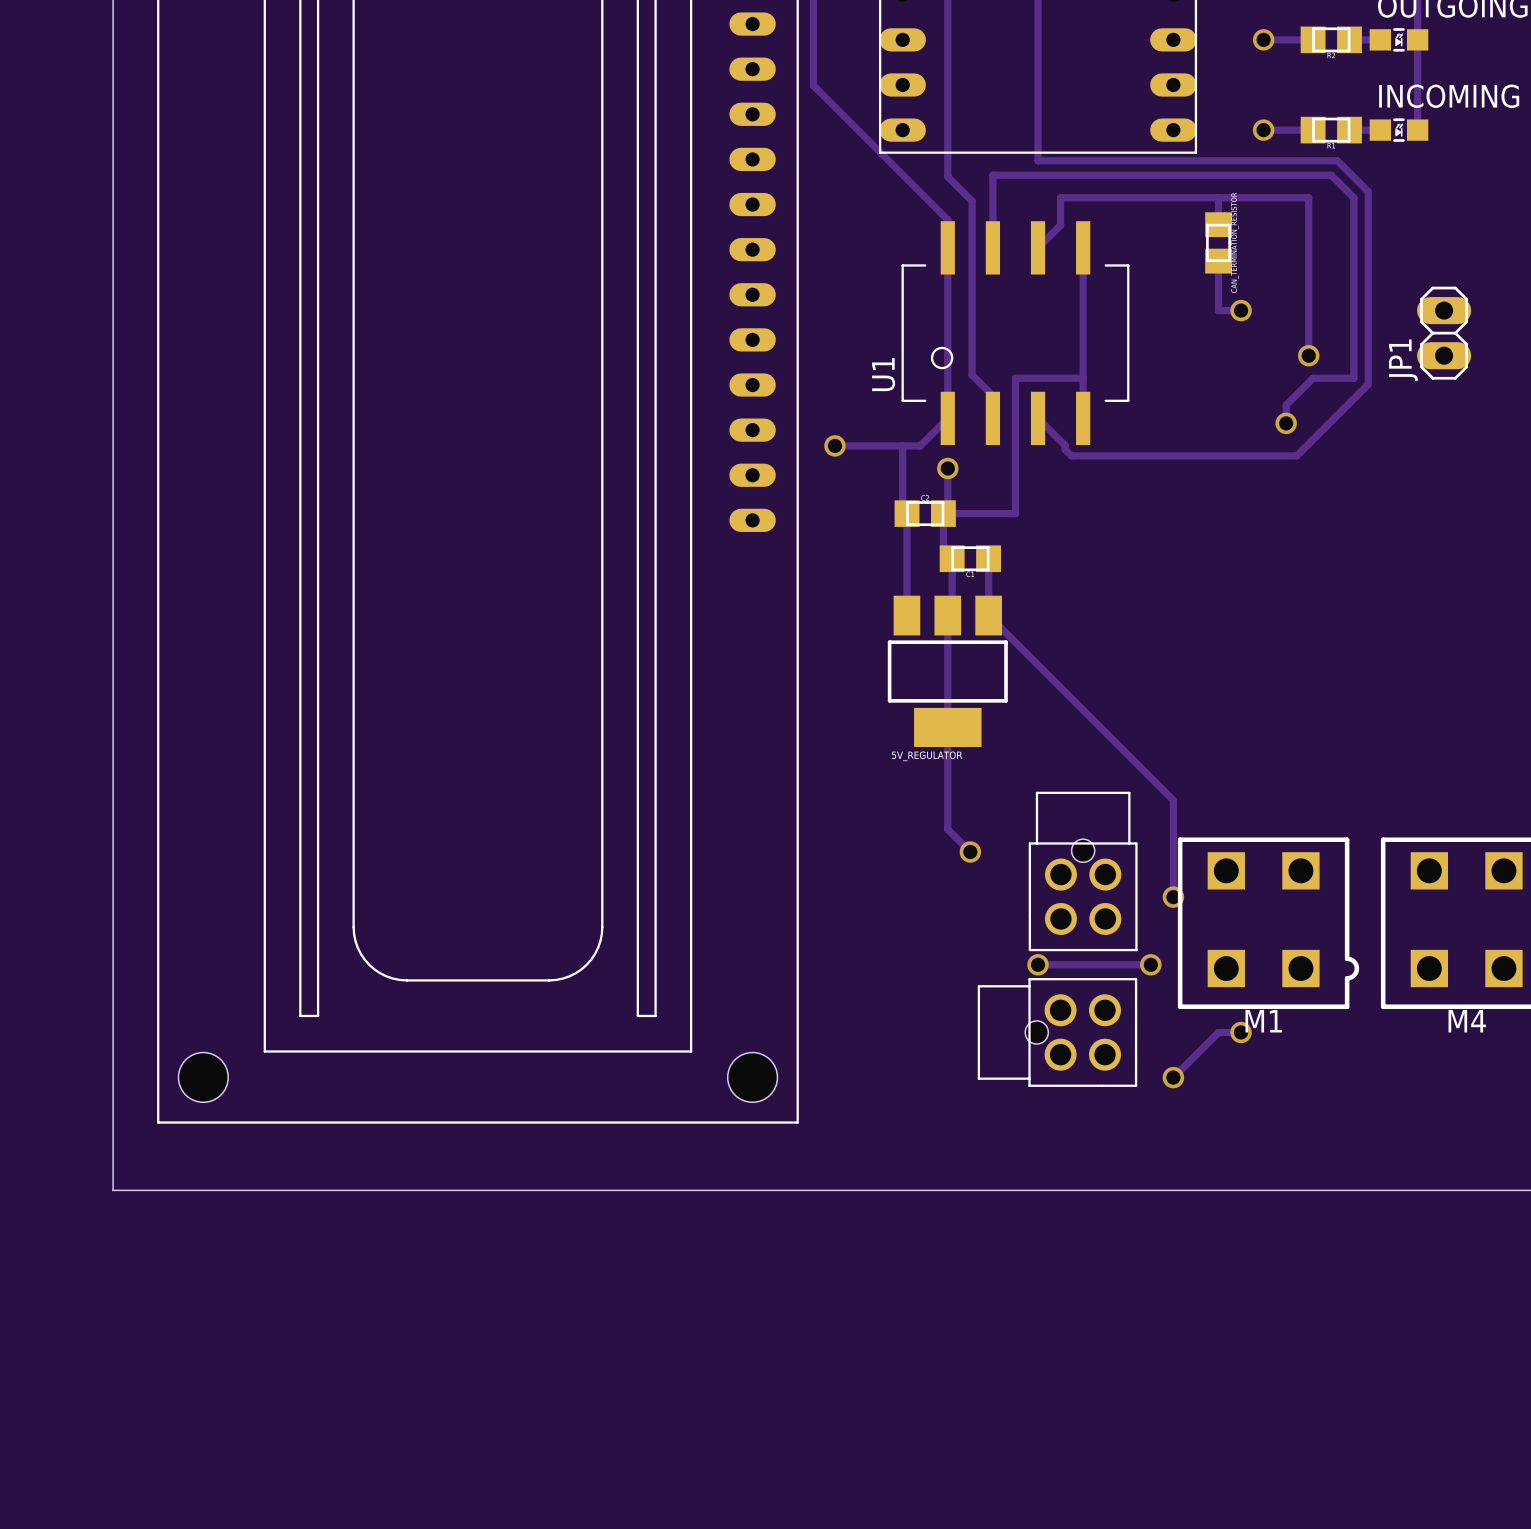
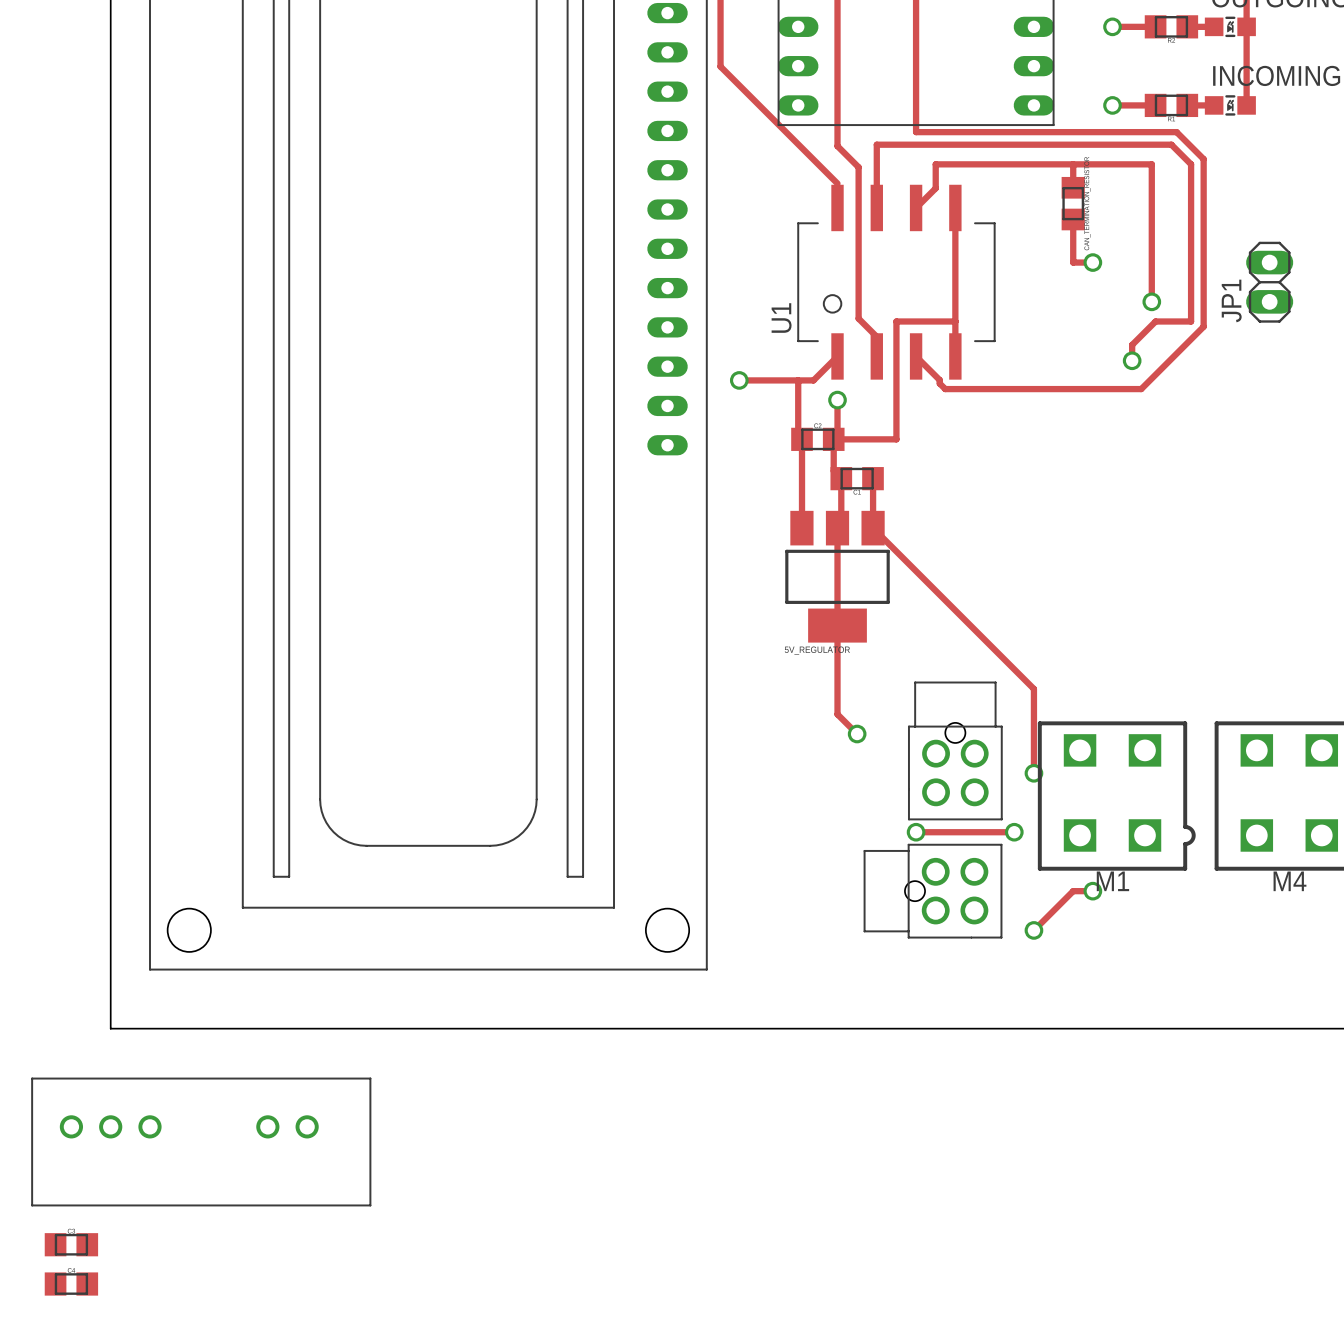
track: (947, 219) (947, 418) -> none
part: none -> (201, 1141)
part: none -> (71, 1244)
part: none -> (71, 1284)

